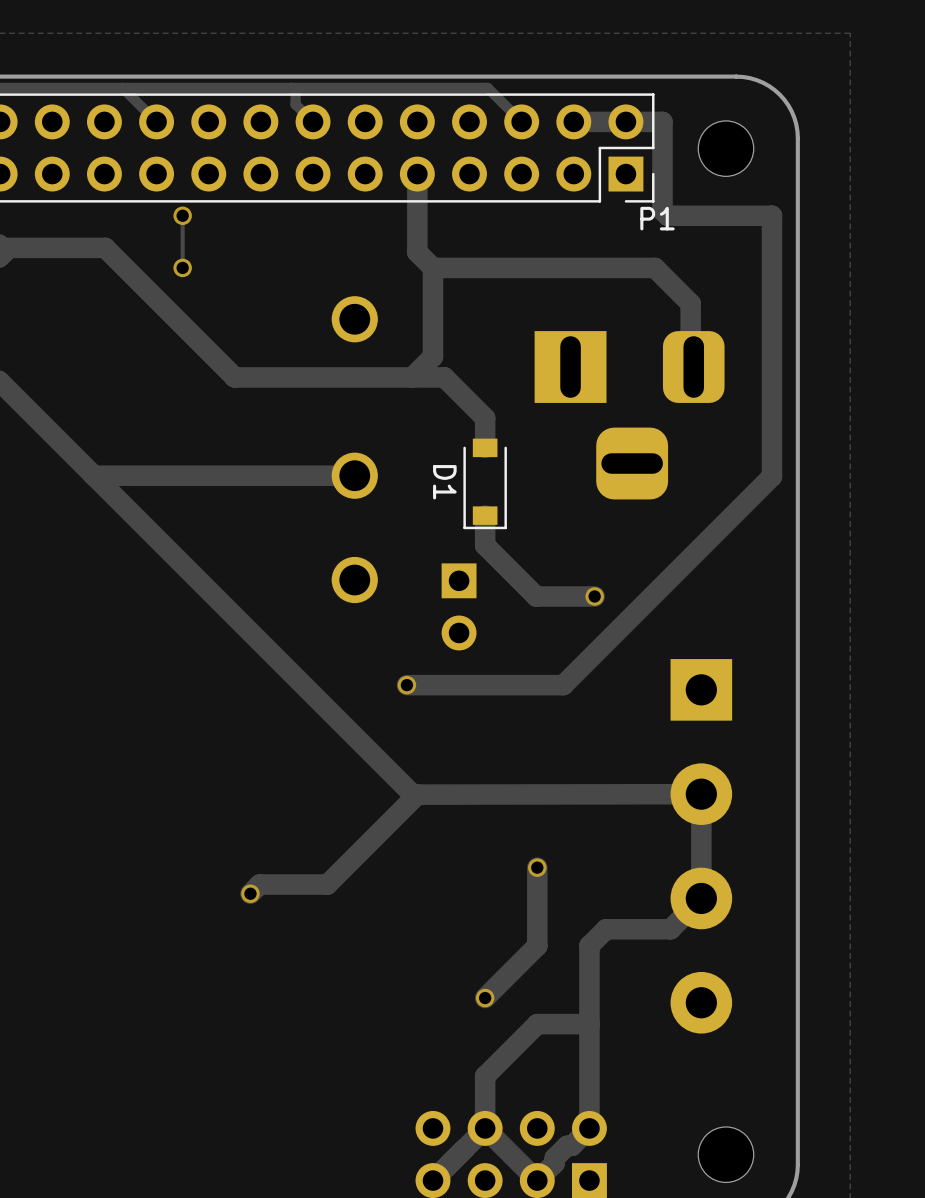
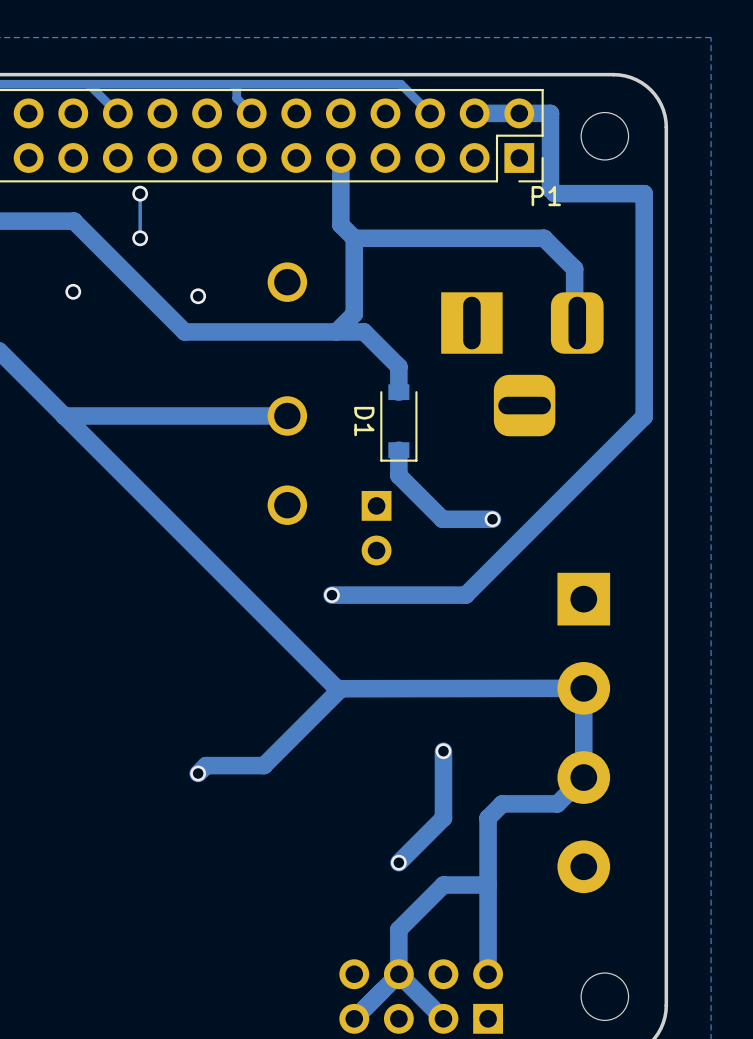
via: none -> (73, 291)
via: none -> (198, 296)
track: (589, 1128) (572, 1145) (566, 1145) (554, 1158) (554, 1163) (537, 1180) -> none

